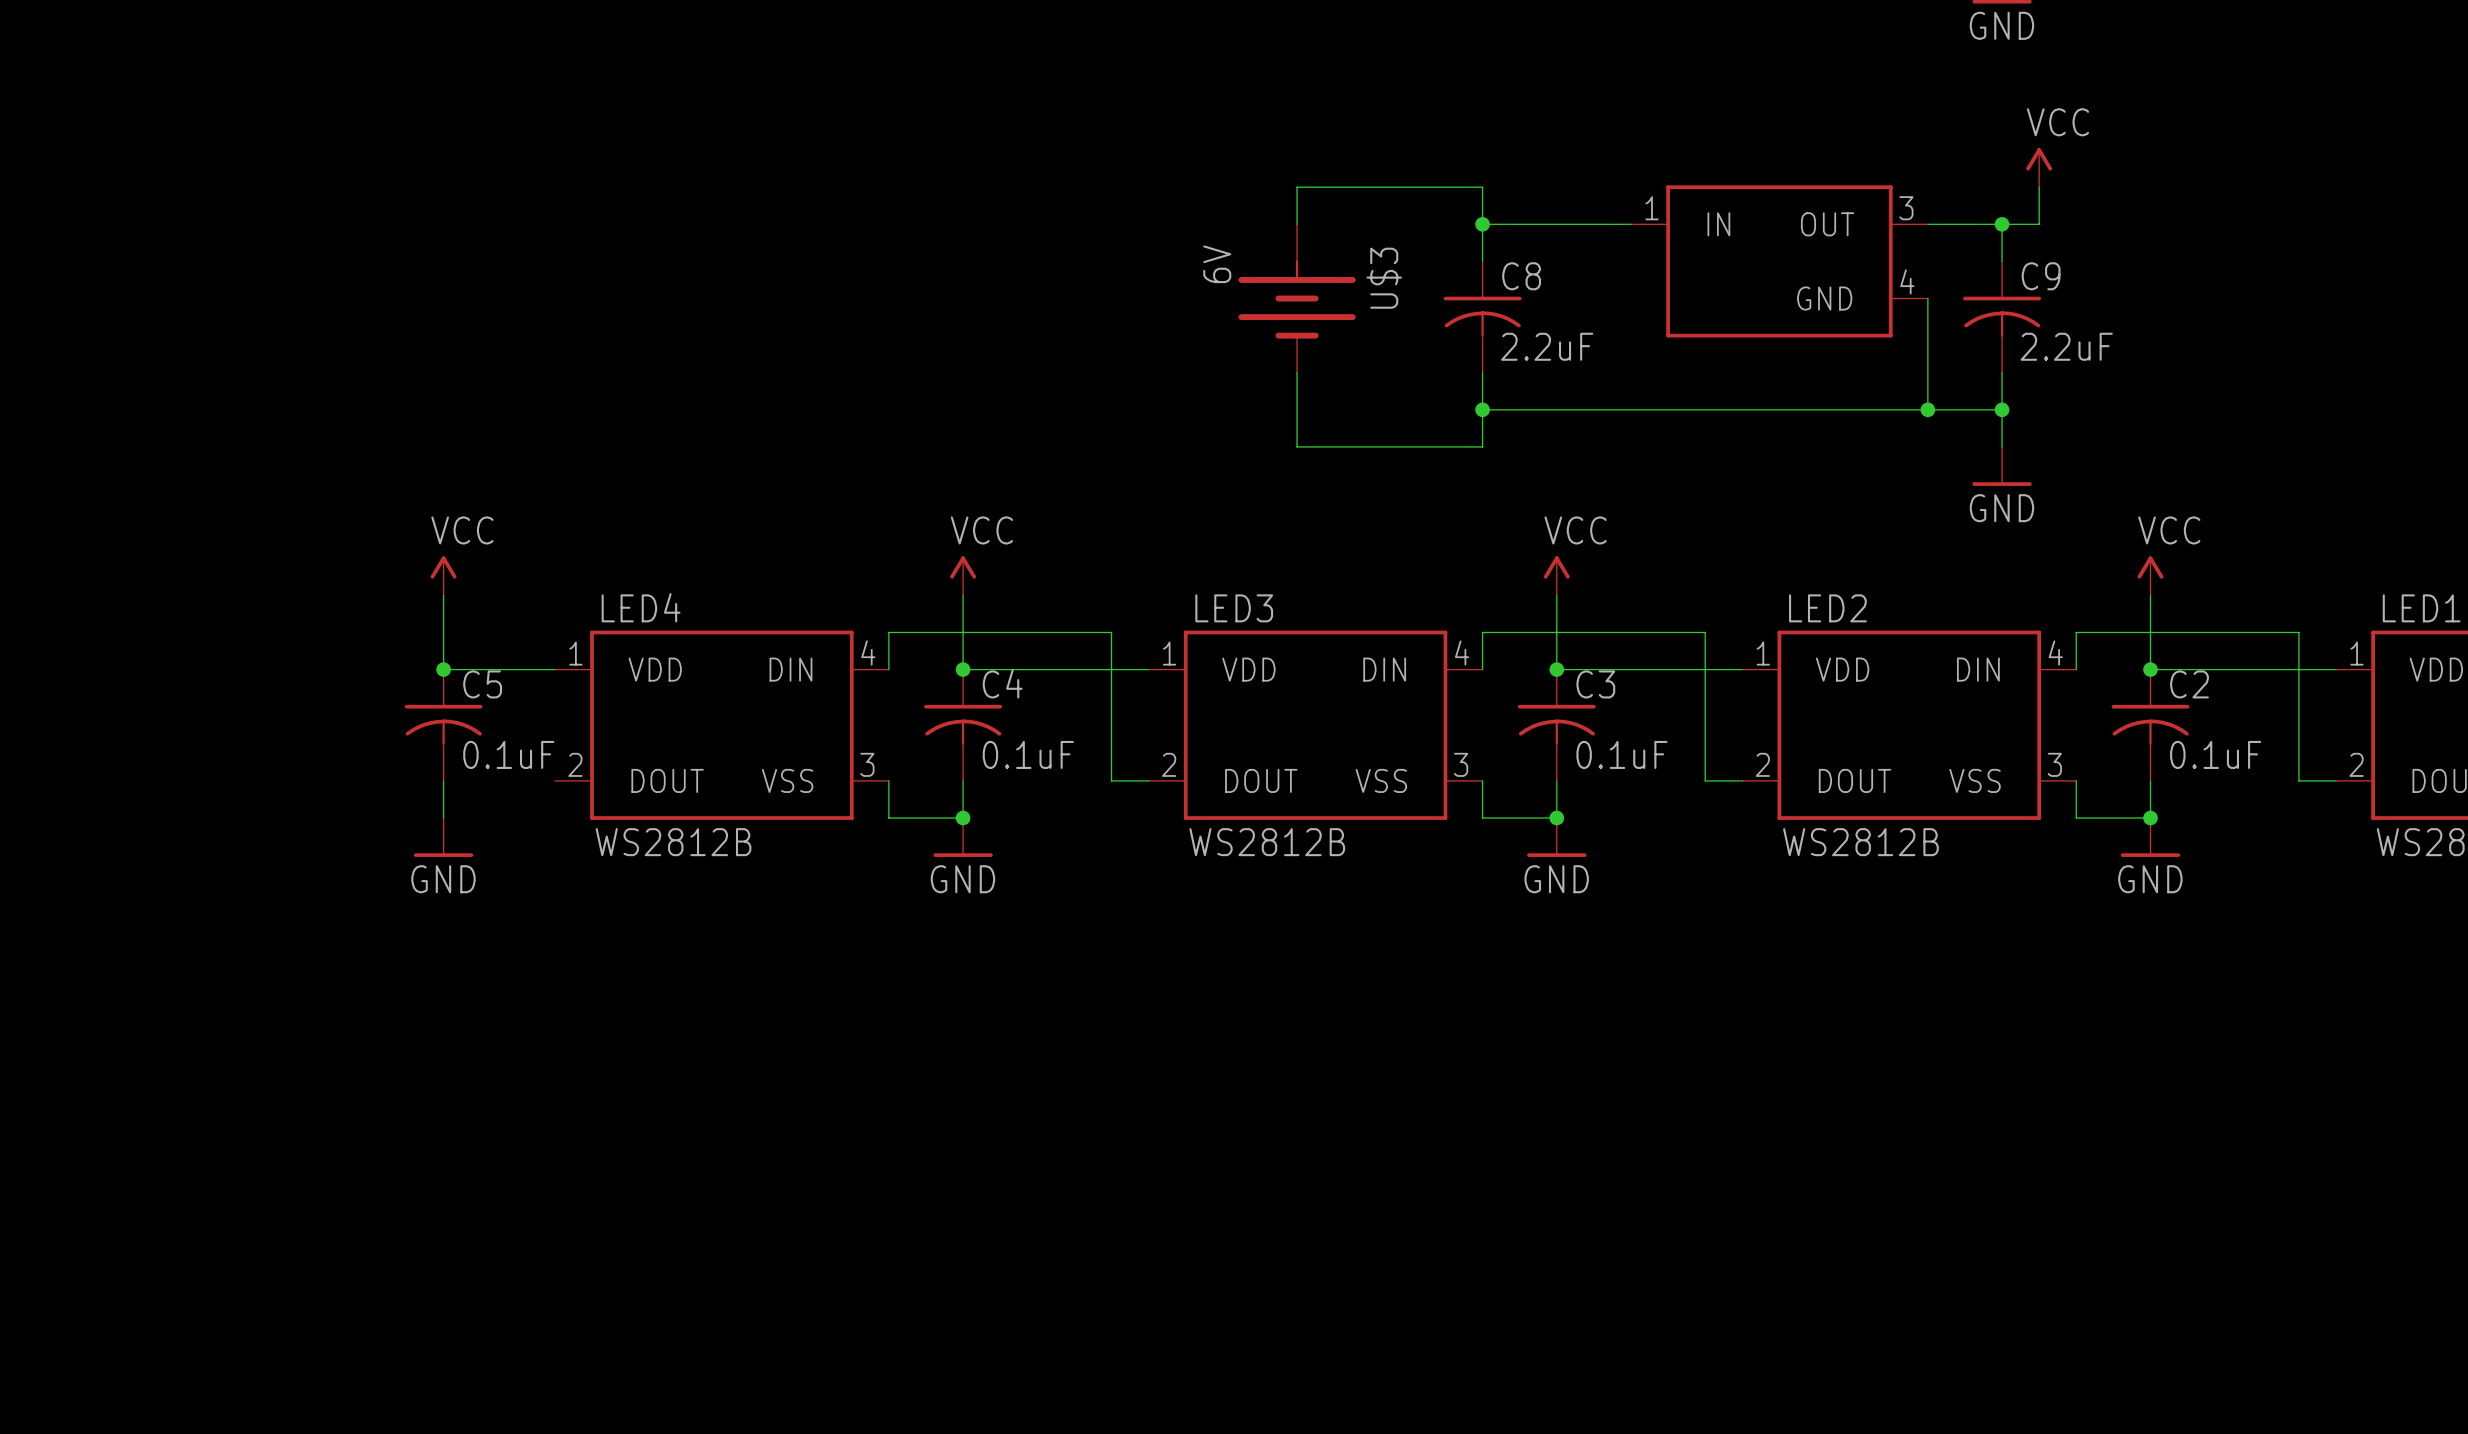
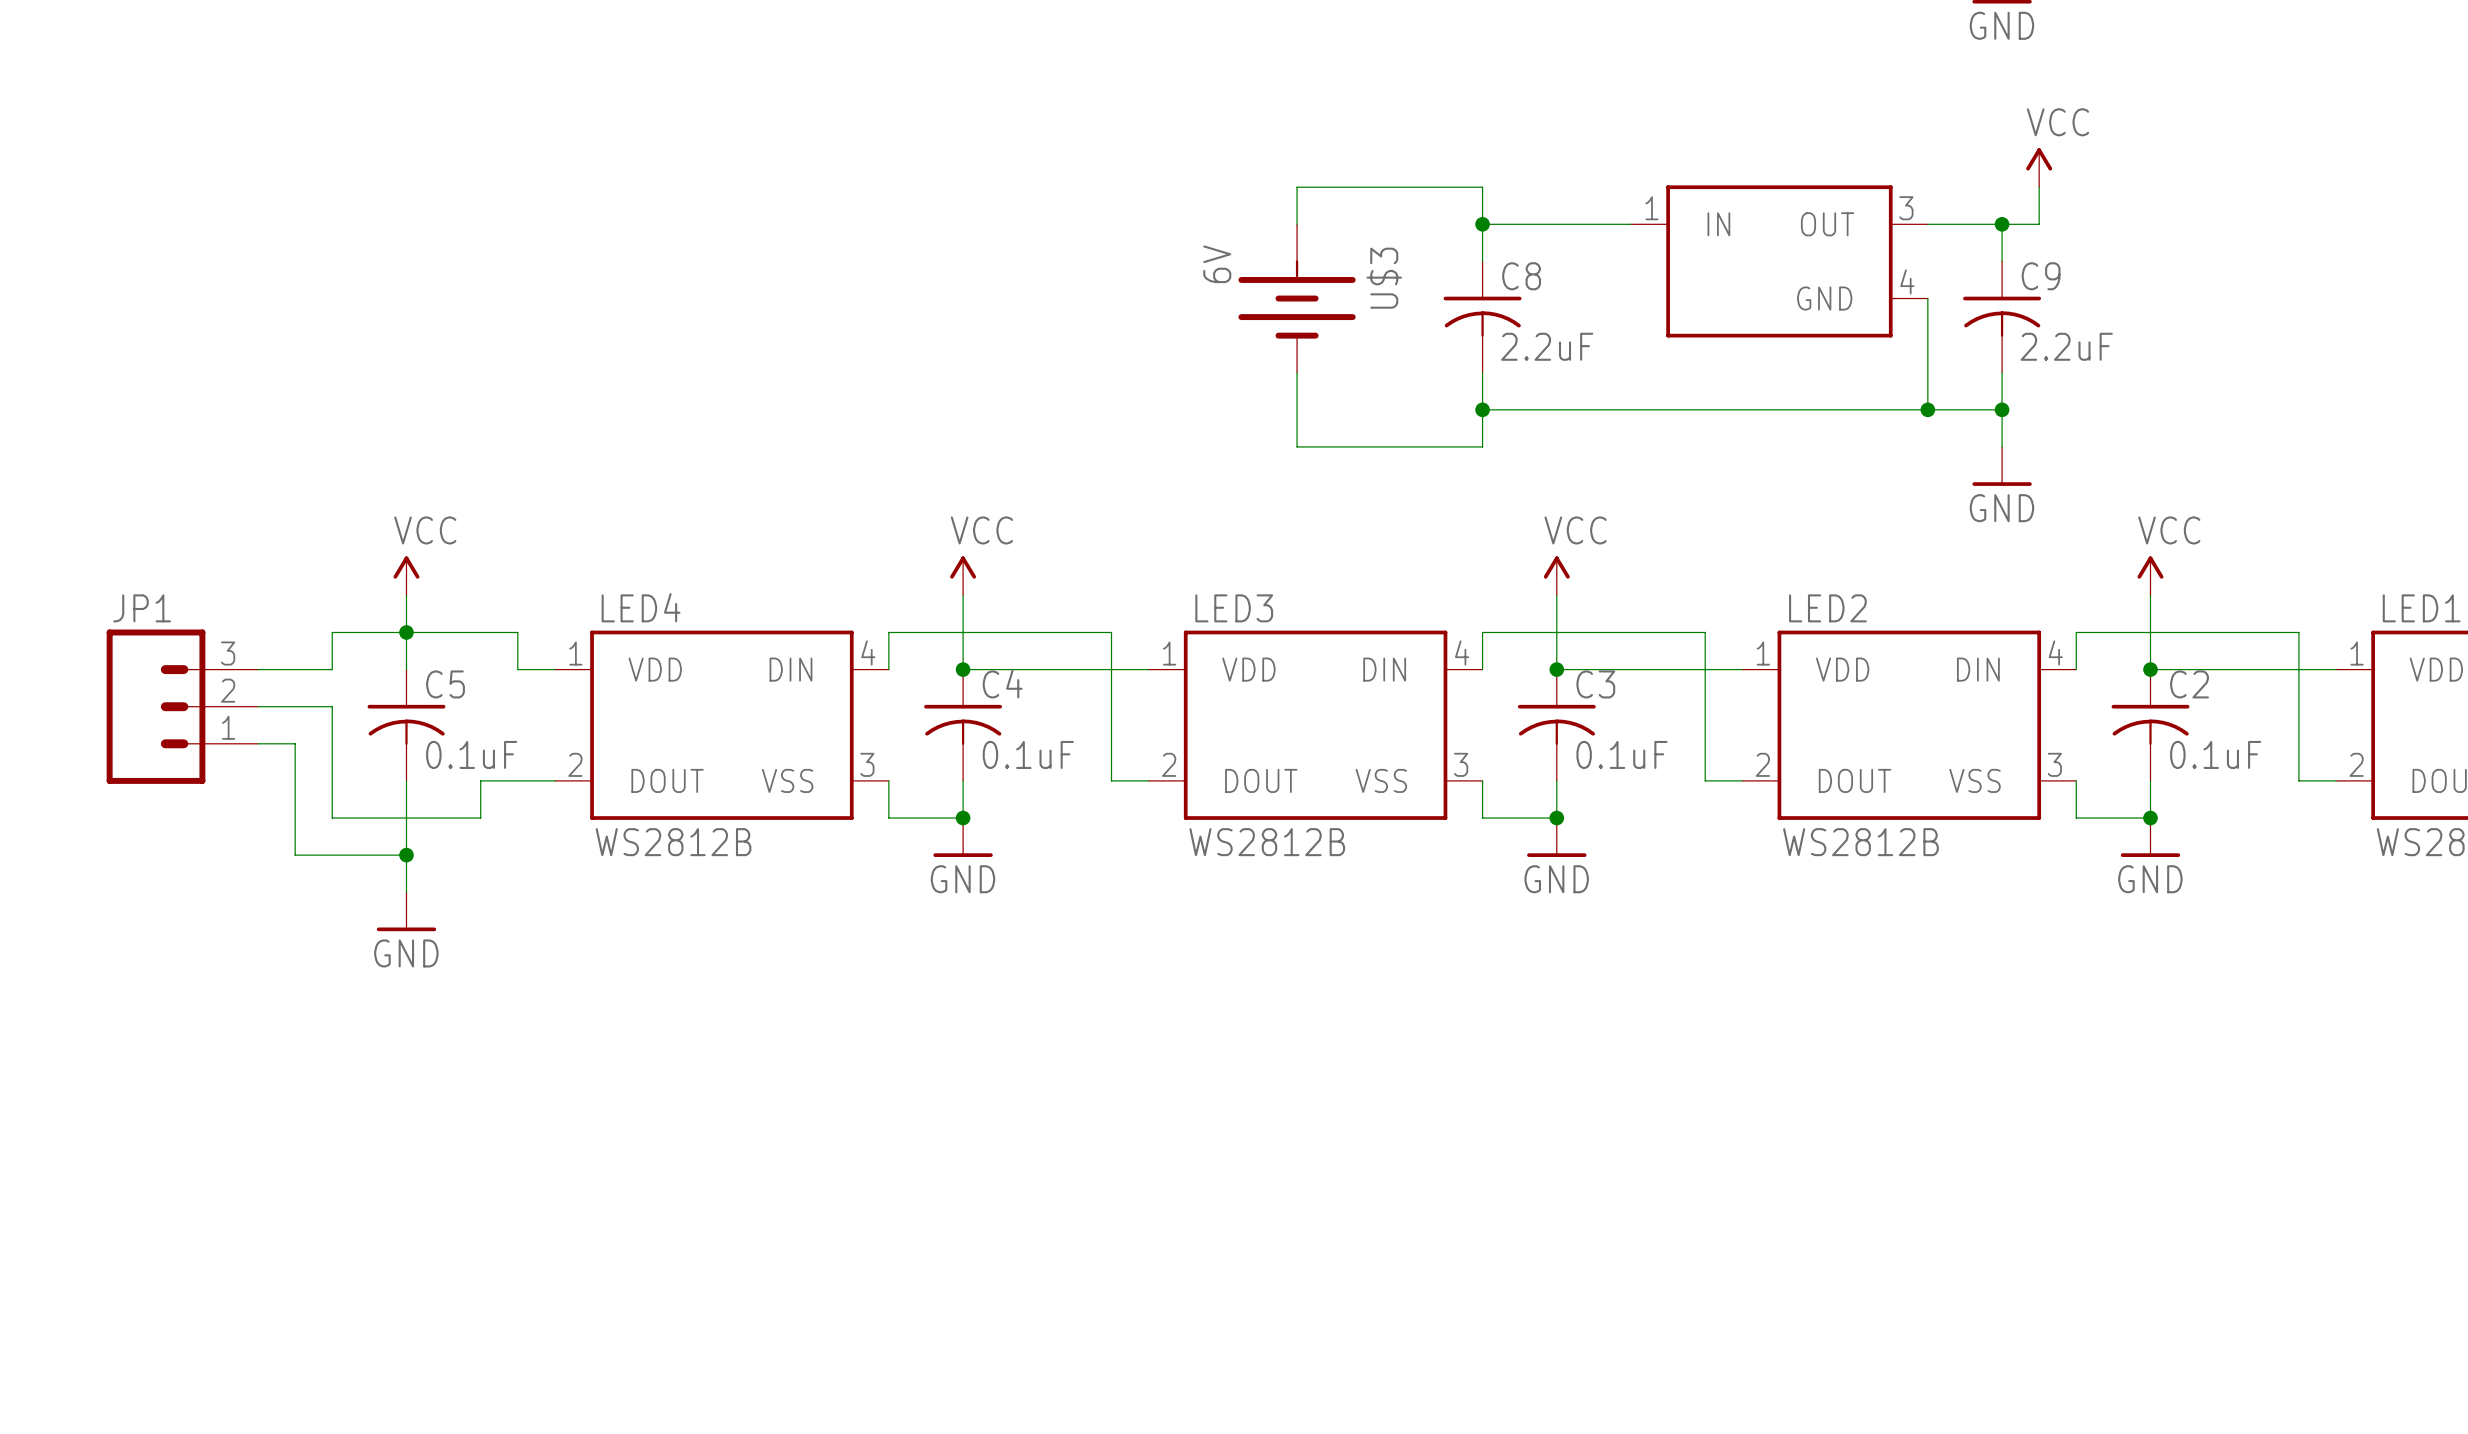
power symbol position: VCC (443, 575) -> VCC (406, 575)
wire: none -> (406, 595) (406, 669)
wire: (443, 595) (443, 669) (517, 669) -> (258, 669) (332, 669) (332, 632) (517, 632) (517, 669)
junction position: (443, 669) -> (406, 632)
JP1: none -> (182, 706)
wire: none -> (258, 706) (332, 706) (332, 818) (480, 818) (480, 780) (554, 780)
C5 position: (443, 725) -> (406, 725)
wire: none -> (258, 743) (295, 743) (295, 855) (406, 855)
wire: none -> (406, 780) (406, 892)
wire: (443, 780) (443, 818) -> none
power symbol position: GND (443, 837) -> GND (406, 911)
junction: none -> (406, 855)

